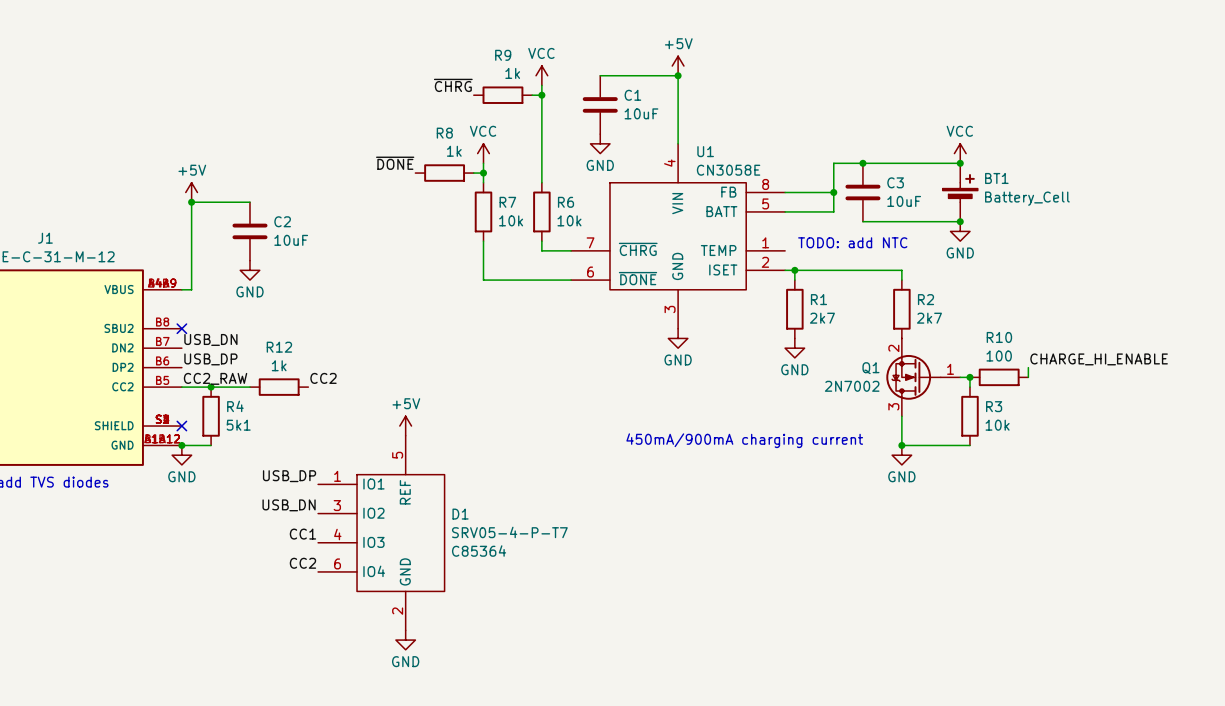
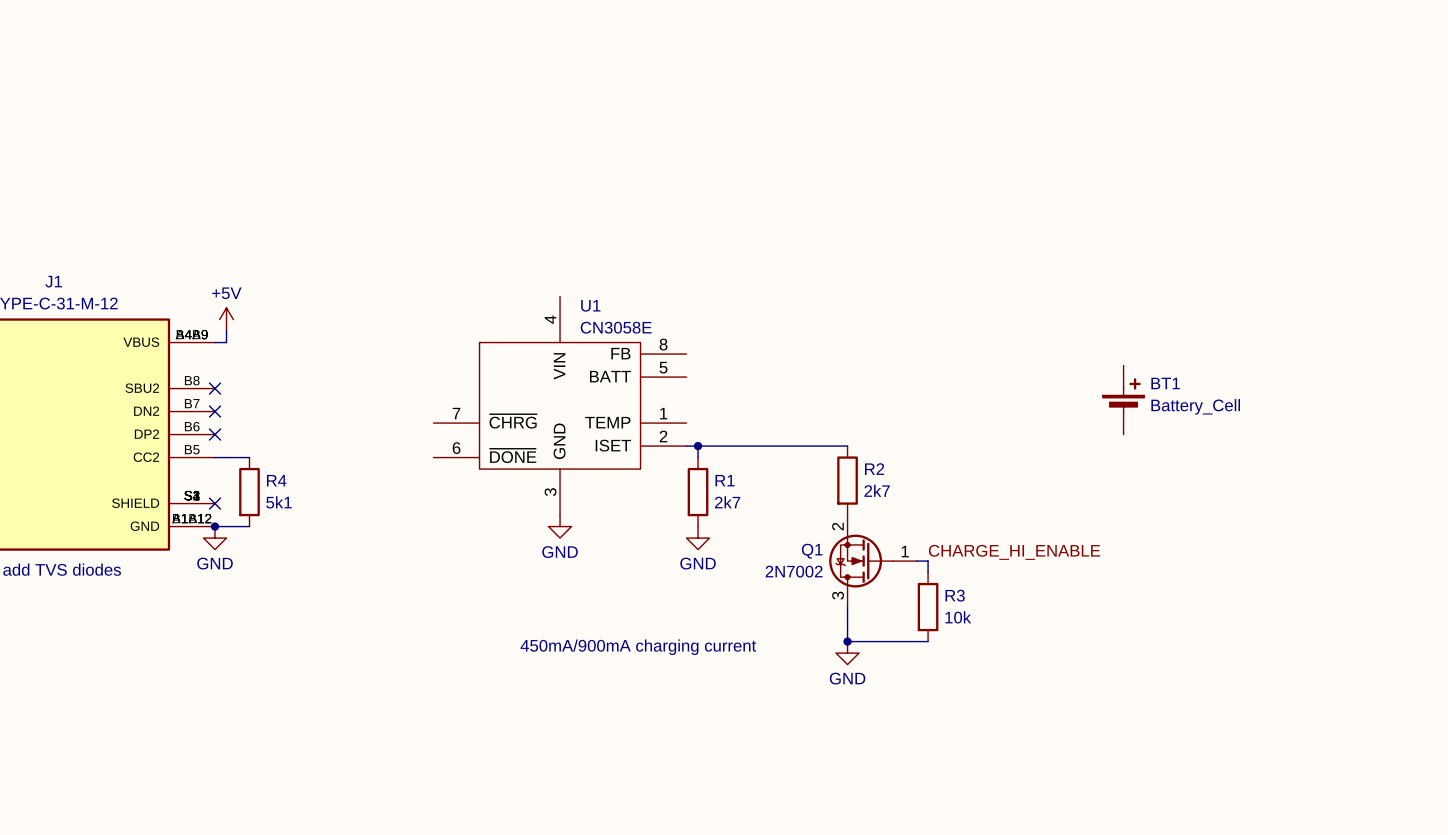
power symbol: +5V (678, 66) -> none
power symbol: VCC (541, 75) -> none
wire: (600, 75) (678, 75) (678, 143) -> none
junction: (678, 75) -> none
label: ~{CHRG} (453, 85) -> none
wire: (541, 85) (541, 182) -> none
R9: 1k (502, 95) -> none
wire: (532, 95) (541, 95) -> none
junction: (541, 95) -> none
C1: 10uF (600, 104) -> none
power symbol: GND (600, 143) -> none
power symbol: VCC (483, 153) -> none
power symbol: VCC (960, 153) -> none
label: ~{DONE} (395, 163) -> none
wire: (483, 163) (483, 182) -> none
junction: (862, 163) -> none
wire: (960, 163) (833, 163) (833, 211) (785, 211) -> none
junction: (960, 163) -> none
R8: 1k (444, 173) -> none
wire: (473, 173) (483, 173) -> none
junction: (483, 173) -> none
power symbol position: +5V (191, 192) -> +5V (226, 319)
wire: (785, 192) (833, 192) -> none
junction: (833, 192) -> none
C3: 10uF (862, 192) -> none
BT1 position: (960, 192) -> (1123, 400)
junction: (191, 202) -> none
wire: (249, 202) (191, 202) (191, 280) -> none
R7: 10k (483, 211) -> none
R6: 10k (541, 211) -> none
wire: (862, 221) (960, 221) -> none
junction: (960, 221) -> none
C2: 10uF (249, 231) -> none
power symbol: GND (960, 231) -> none
U1 position: (678, 236) -> (560, 405)
wire: (483, 241) (483, 280) (571, 280) -> none
wire: (541, 241) (541, 250) (571, 250) -> none
text: TODO: add NTC (852, 242) -> none
power symbol: GND (249, 270) -> none
wire: (785, 270) (901, 270) (901, 280) -> none
wire: (794, 270) (794, 280) -> none
junction: (794, 270) -> none
R1 position: (794, 309) -> (698, 492)
R2 position: (901, 309) -> (847, 480)
power symbol: GND (678, 338) -> none
label: USB_DN (210, 339) -> none
no-connect mark: none -> (214, 411)
power symbol: GND (794, 348) -> none
label: USB_DP (210, 359) -> none
label: CHARGE_HI_ENABLE (1099, 359) -> none
no-connect mark: none -> (214, 434)
wire: (1028, 367) (1028, 377) -> none
wire: none -> (686, 446) (847, 446)
wire: none -> (698, 446) (698, 457)
junction: none -> (698, 446)
Q1 position: (923, 377) -> (872, 561)
wire: (960, 377) (969, 377) (969, 387) -> none
junction: (969, 377) -> none
R10: 100 (999, 377) -> none
label: CC2_RAW (215, 378) -> none
label: CC2 (323, 378) -> none
wire: (211, 387) (249, 387) -> none
junction: (211, 387) -> none
R12: 1k (279, 387) -> none
wire: (901, 416) (901, 445) (969, 445) -> none
R3 position: (969, 416) -> (928, 607)
power symbol: +5V (405, 426) -> none
text: 450mA/900mA charging current (744, 440) -> none
power symbol: none -> GND (560, 526)
junction: (901, 445) -> none
power symbol: none -> GND (698, 538)
power symbol: GND (901, 455) -> none
label: none -> CHARGE_HI_ENABLE (1014, 552)
wire: none -> (916, 561) (928, 561) (928, 572)
label: USB_DP (289, 476) -> none
label: USB_DN (289, 505) -> none
wire: none -> (847, 607) (847, 641) (928, 641)
D1: SRV05-4-P-T7 (381, 533) -> none
label: CC1 (302, 534) -> none
junction: none -> (847, 641)
text: none -> 450mA/900mA charging current (638, 647)
power symbol: none -> GND (847, 653)
label: CC2 (302, 563) -> none
power symbol: GND (405, 640) -> none

